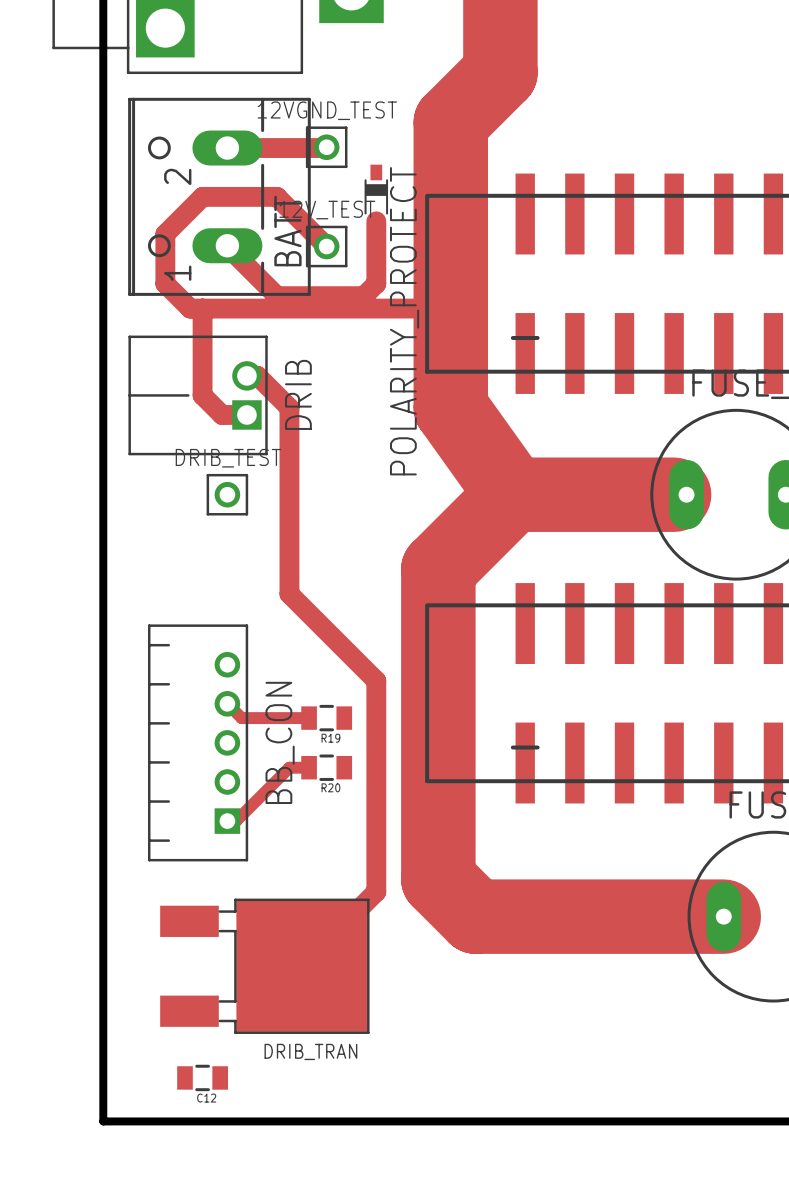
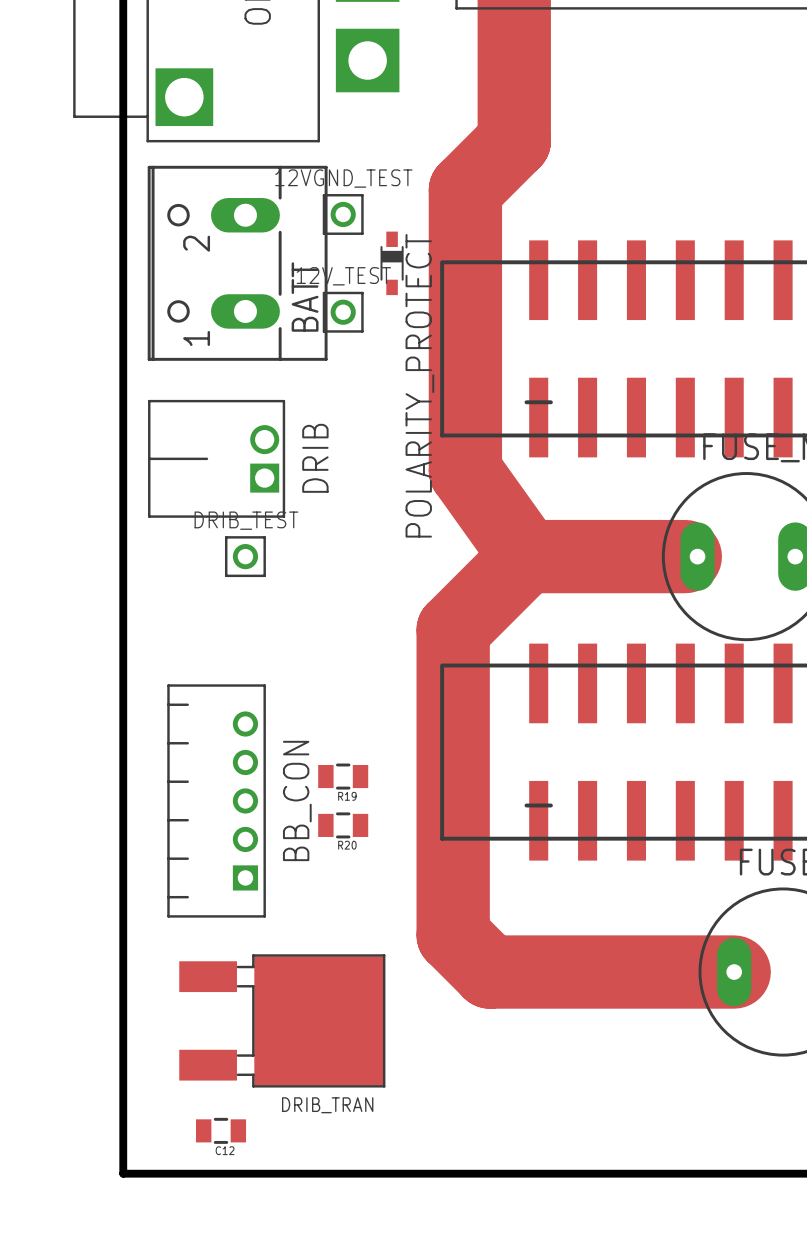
top track: (326, 147) (227, 148) -> none
top track: (376, 221) (376, 283) (363, 296) (277, 296) (227, 245) -> none
top track: (326, 246) (277, 196) (202, 196) (165, 234) (165, 283) (190, 308) (450, 308) -> none
top track: (202, 308) (202, 395) (222, 414) (246, 414) -> none
top track: (246, 375) (257, 375) (289, 407) (289, 593) (376, 680) (376, 891) (301, 966) -> none
top track: (227, 703) (241, 718) (309, 718) -> none
top track: (309, 767) (289, 767) (236, 821) (227, 821) -> none

